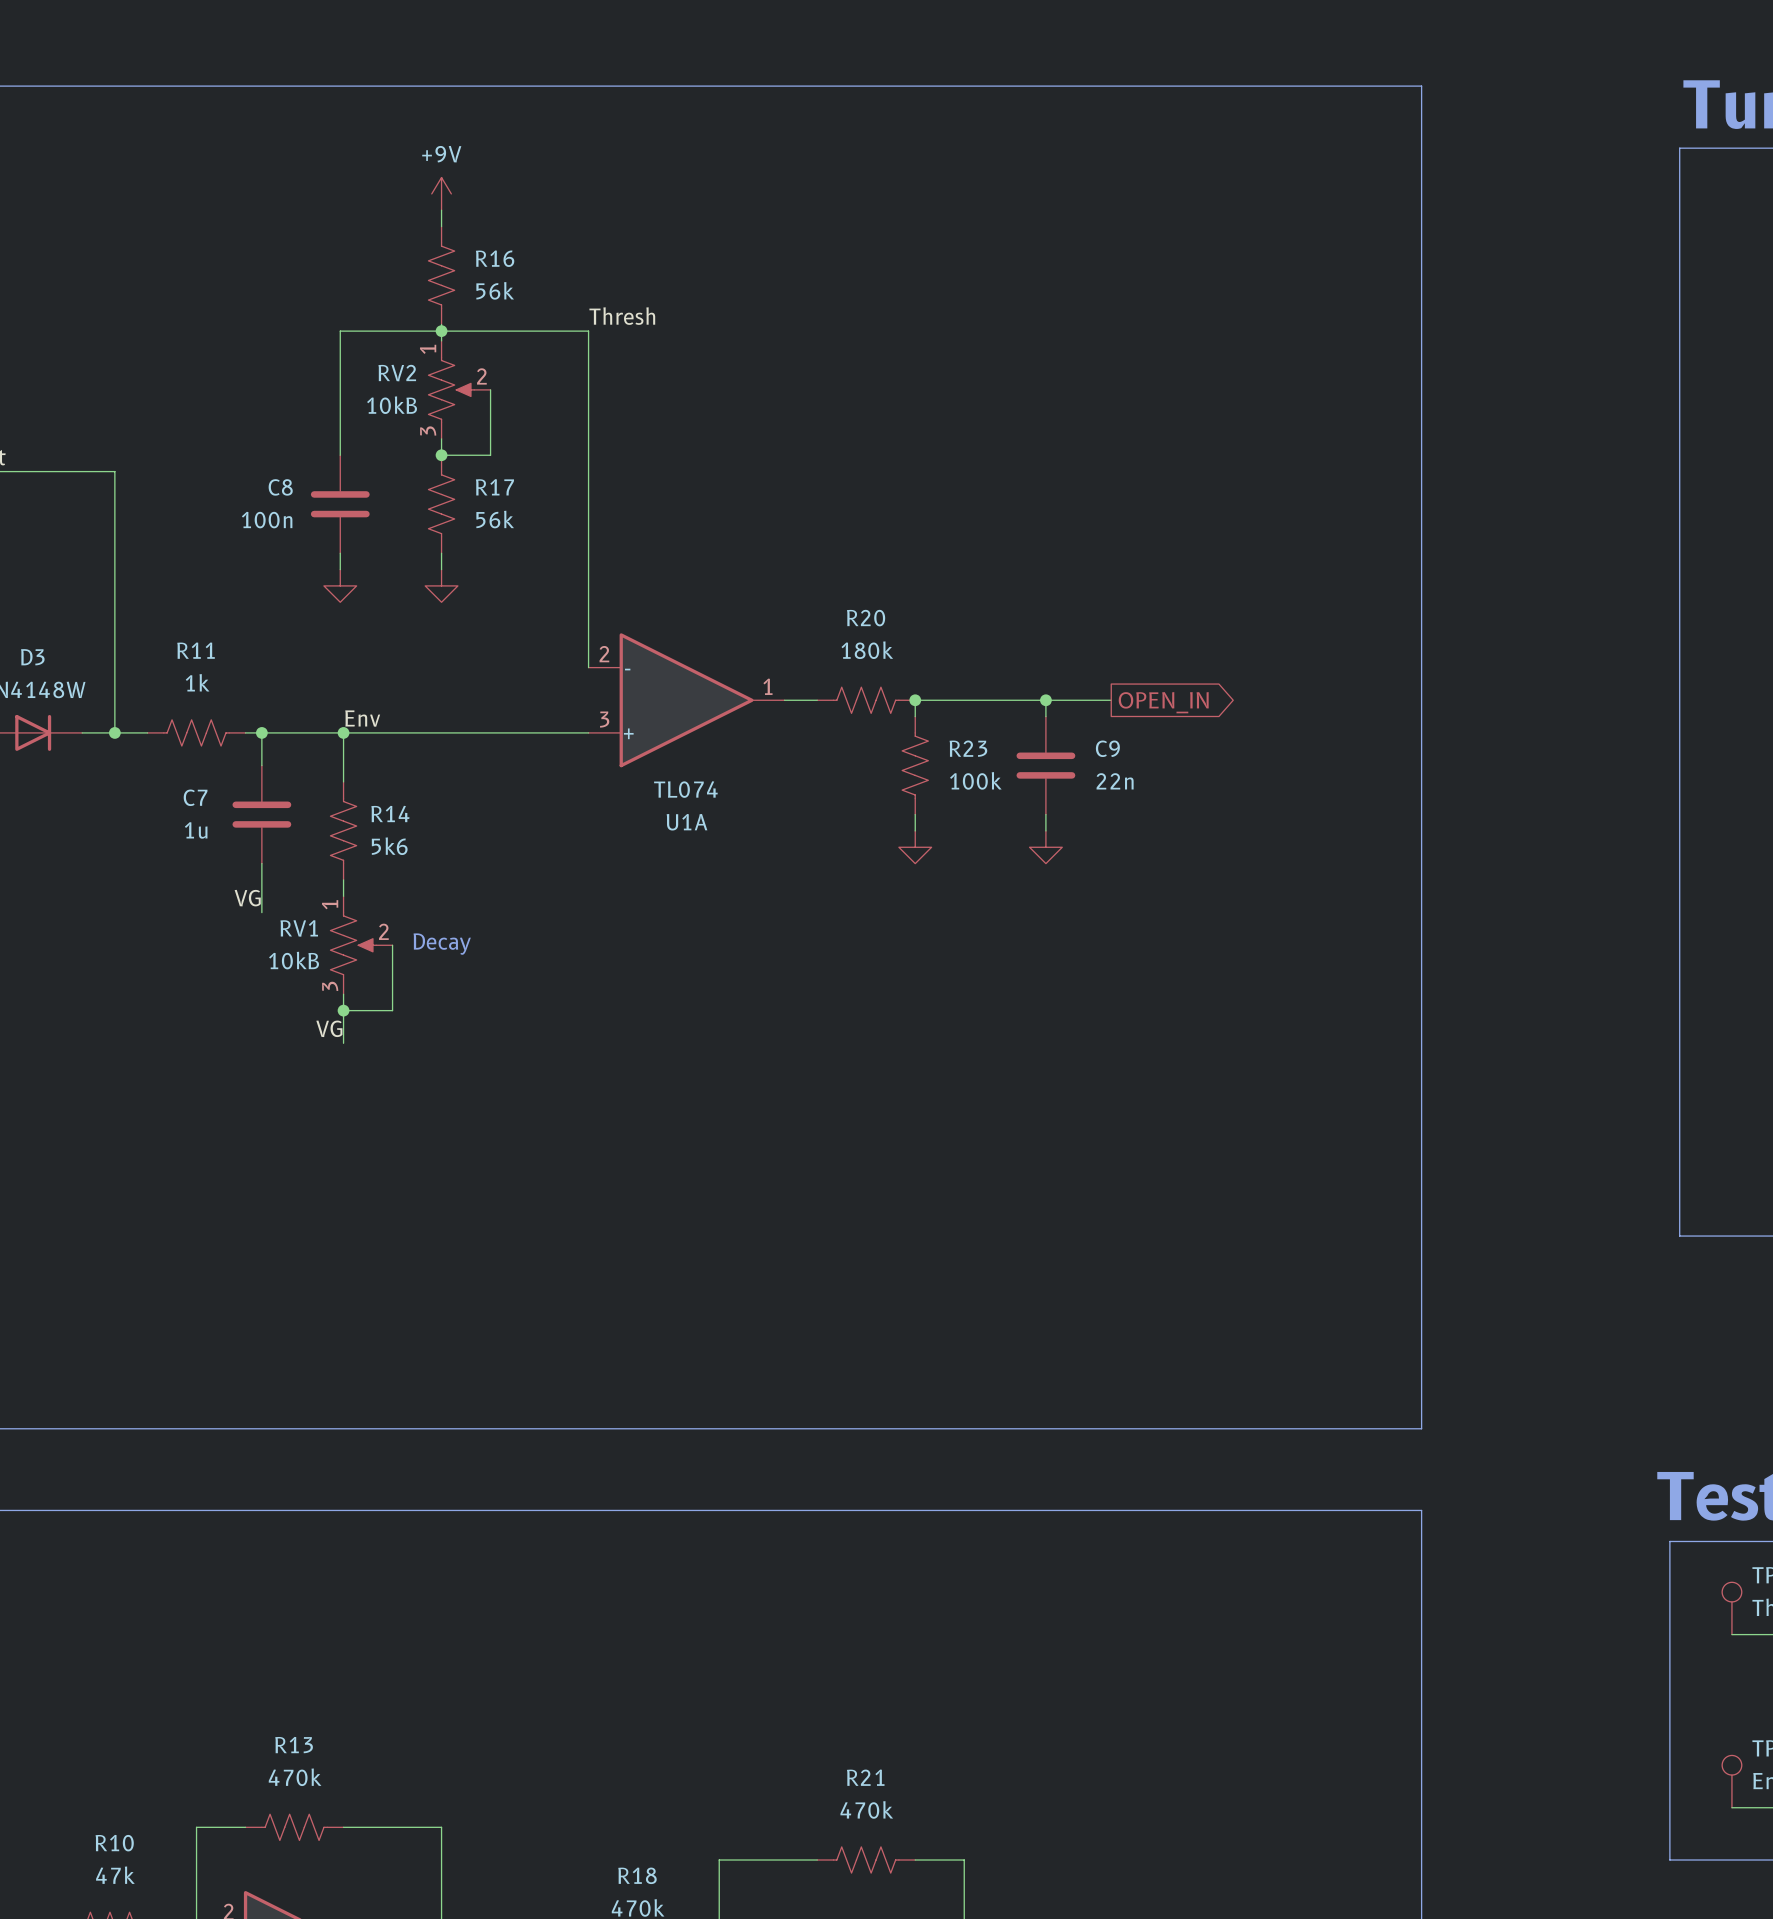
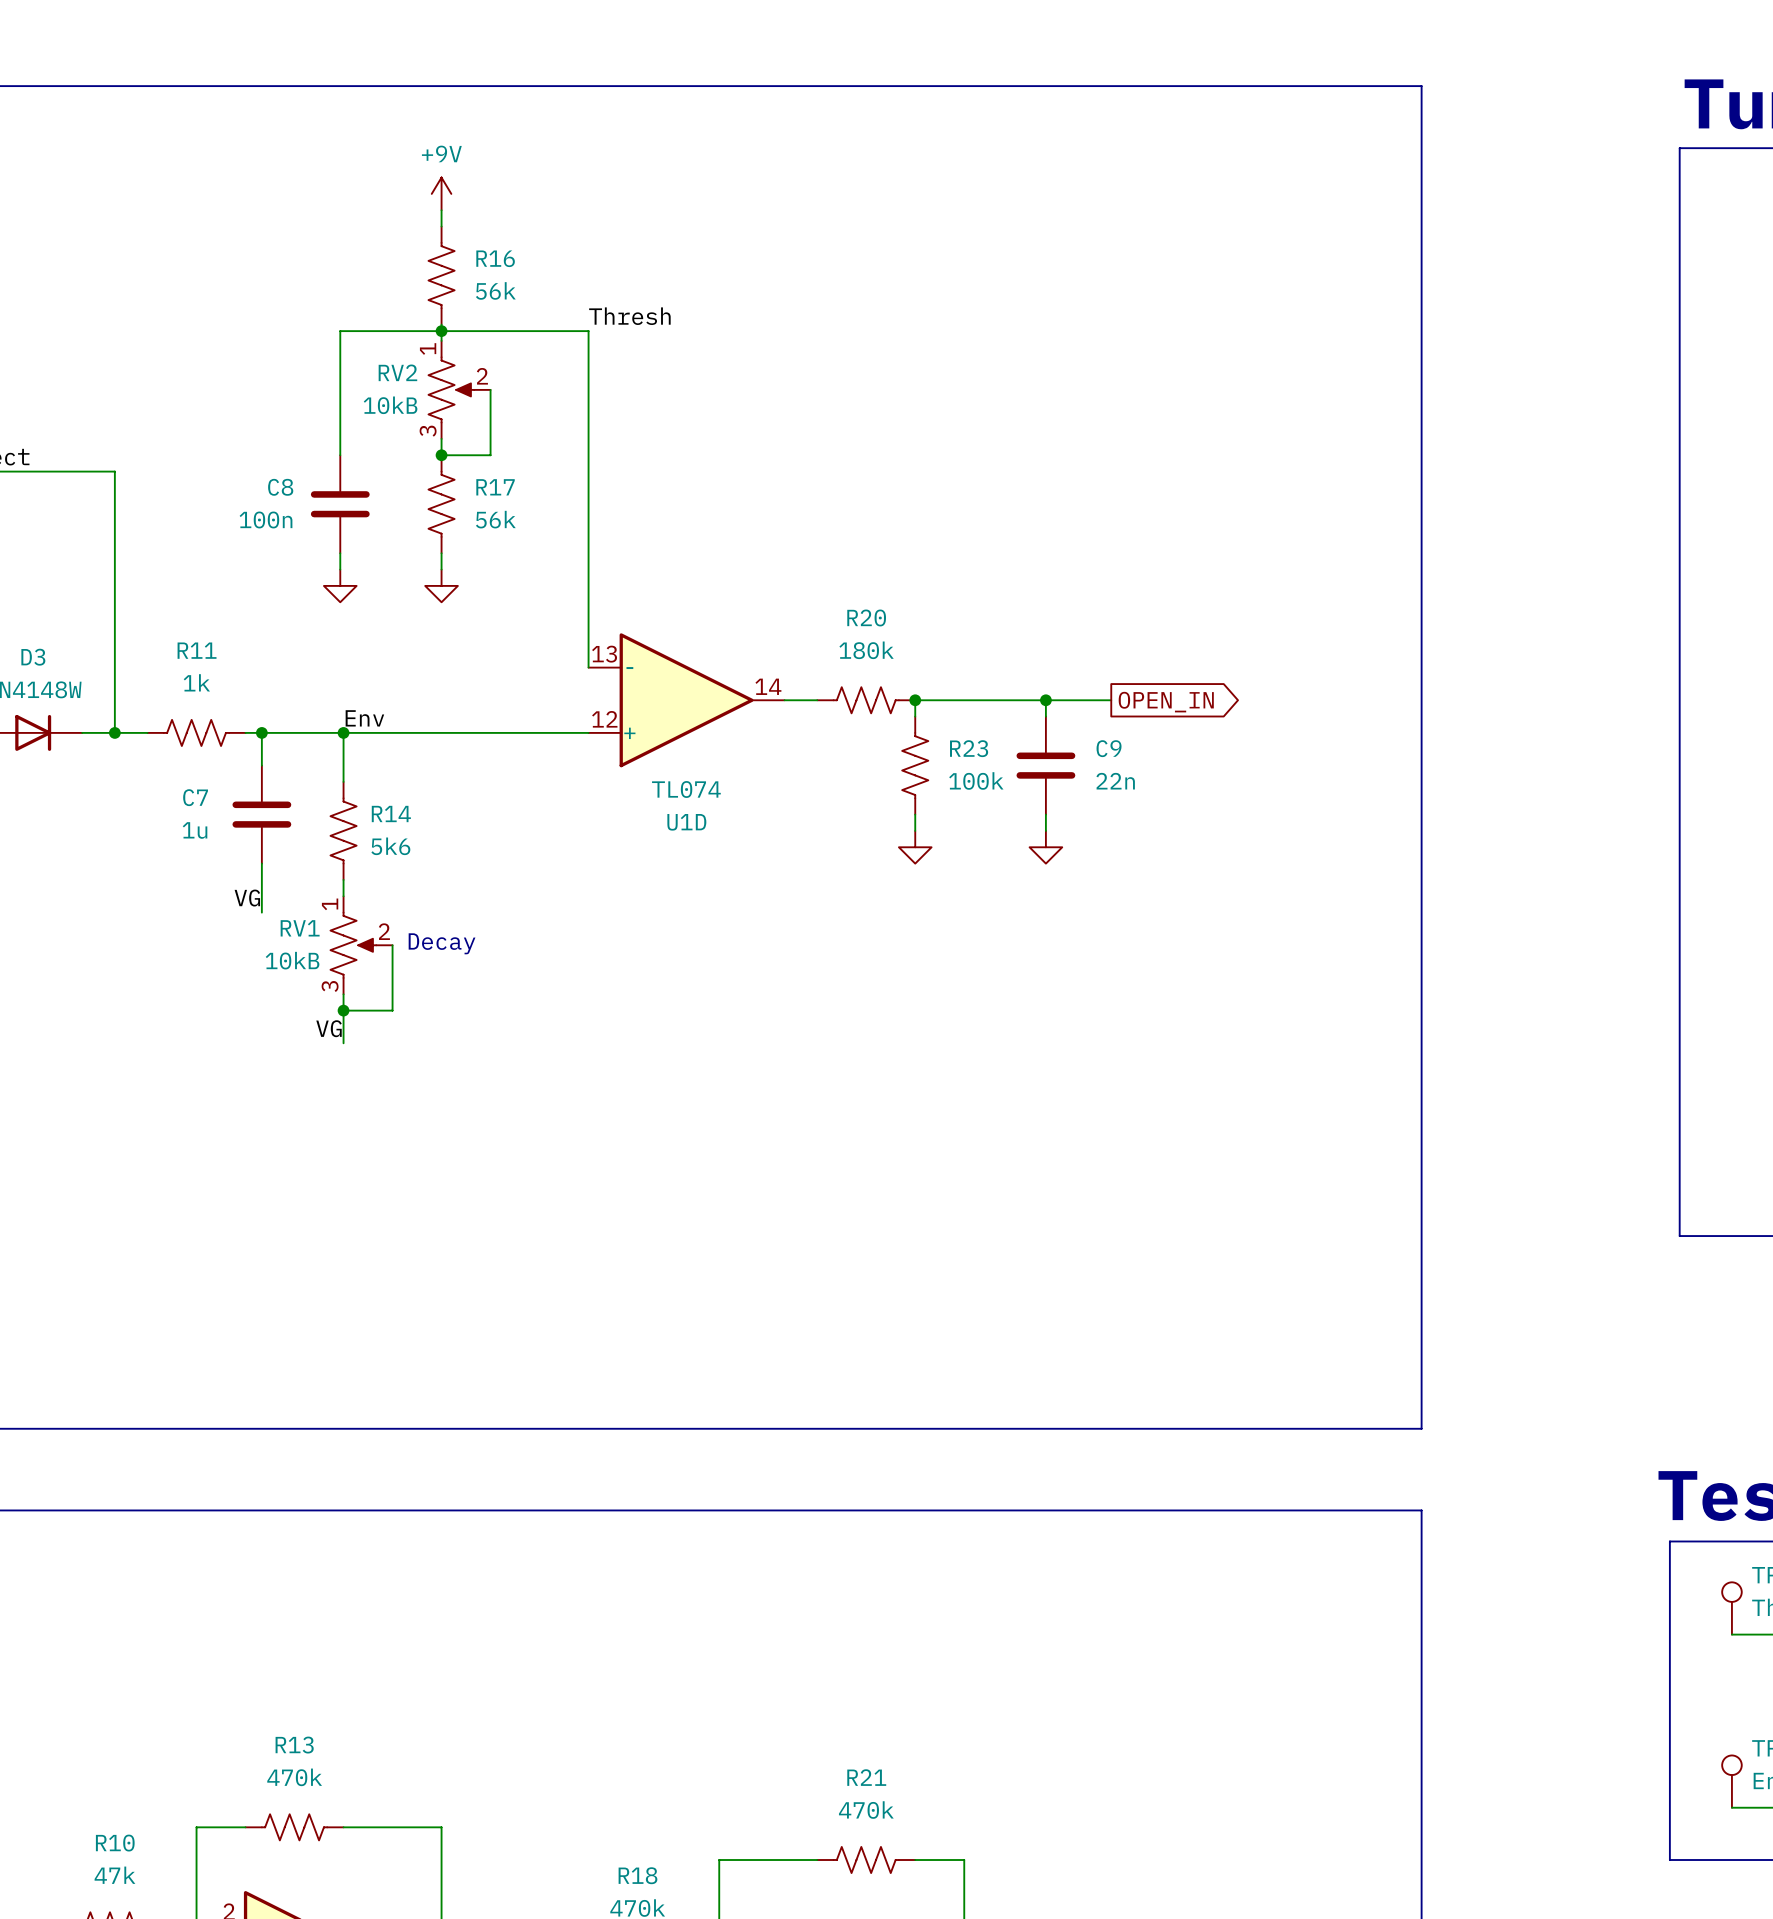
U1A pin number: 2 (604, 654) -> 13 (604, 654)
U1A pin number: 1 (767, 686) -> 14 (768, 686)
U1A pin number: 3 (604, 719) -> 12 (604, 719)
U1A name: U1A (687, 822) -> U1D (686, 822)

